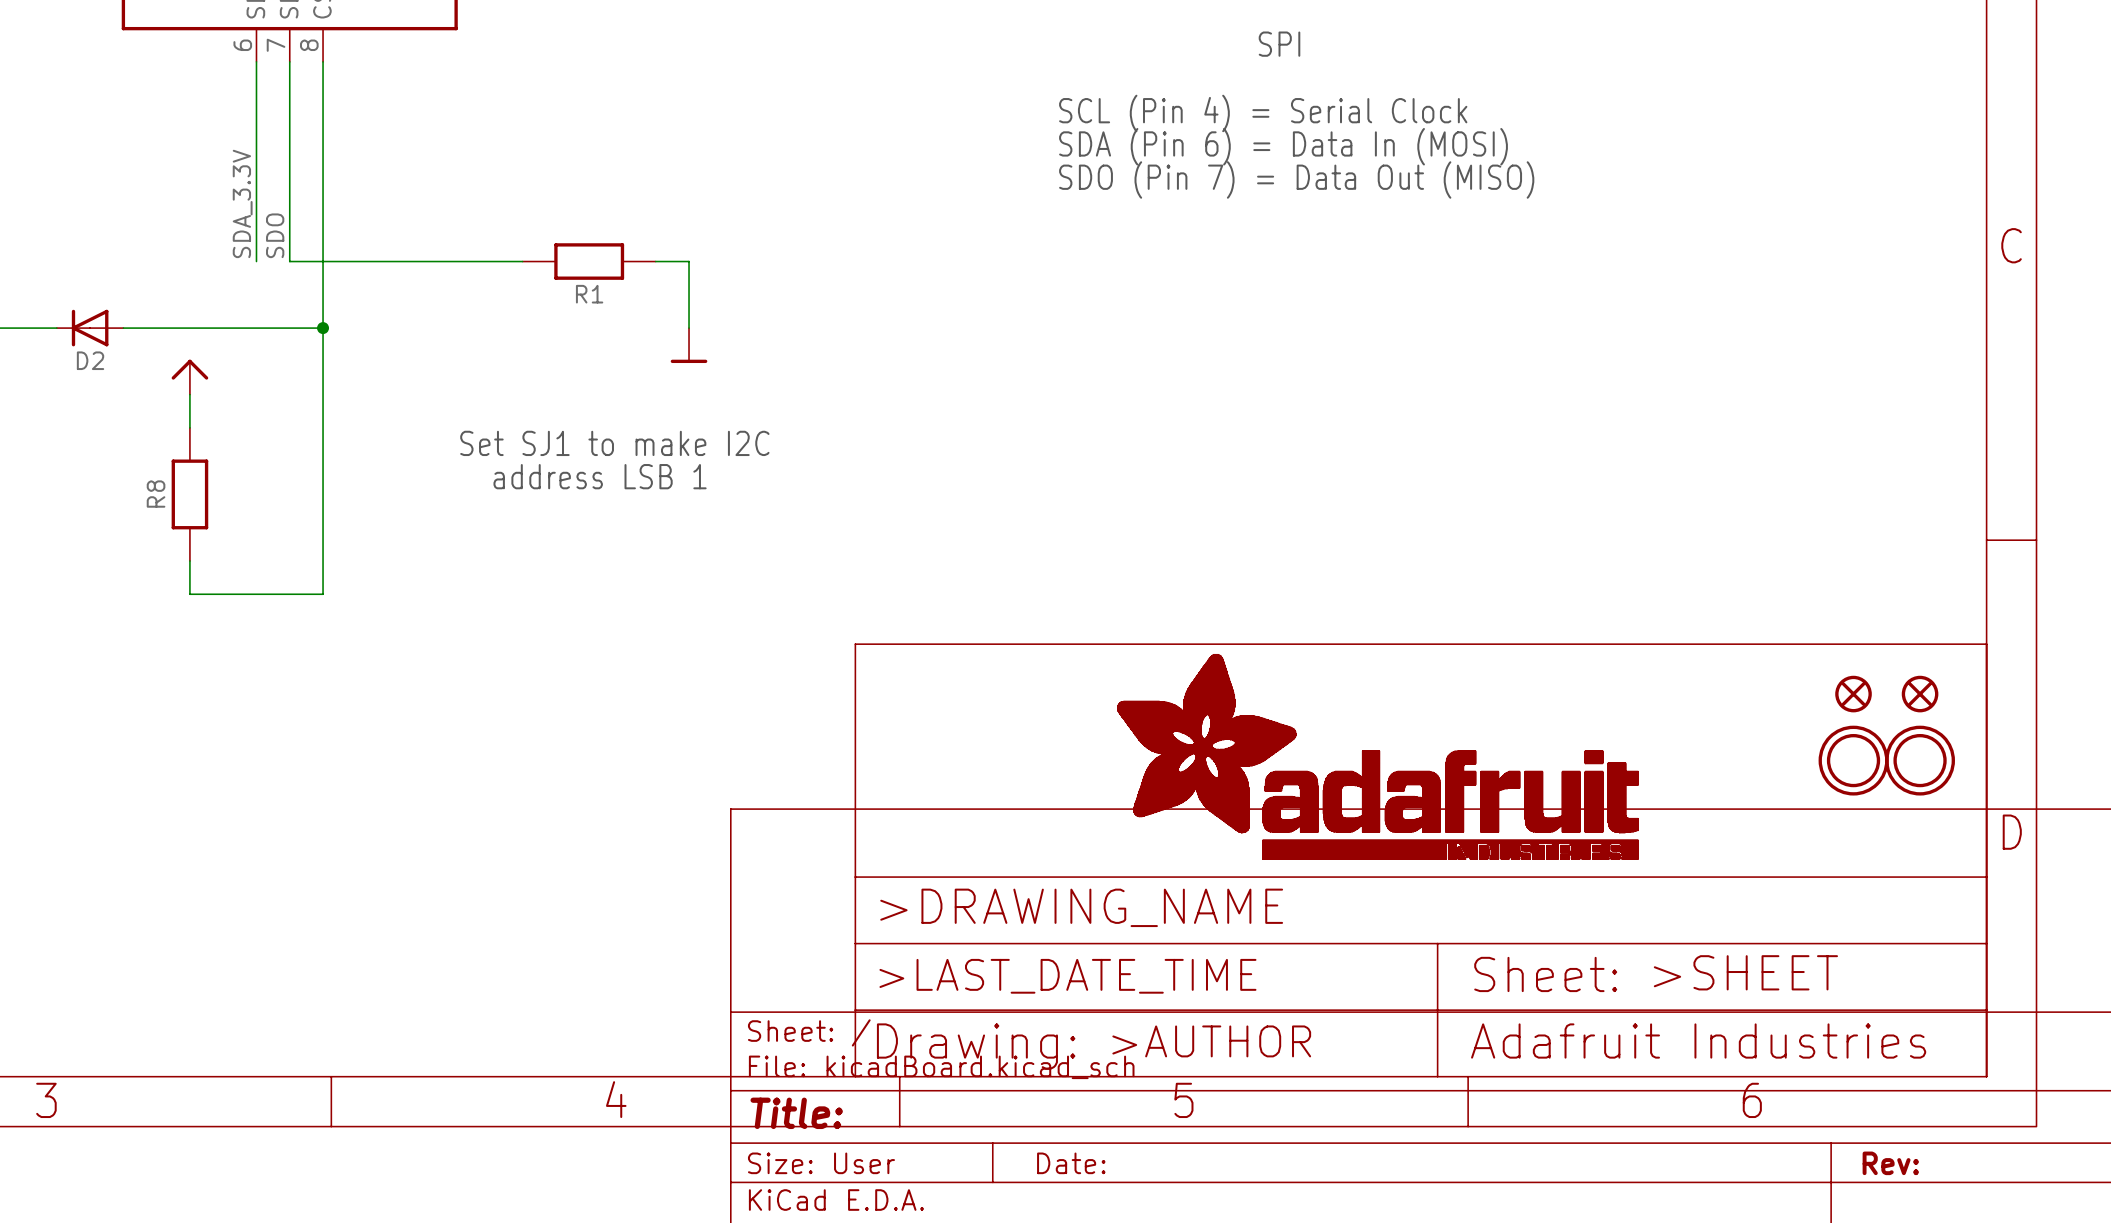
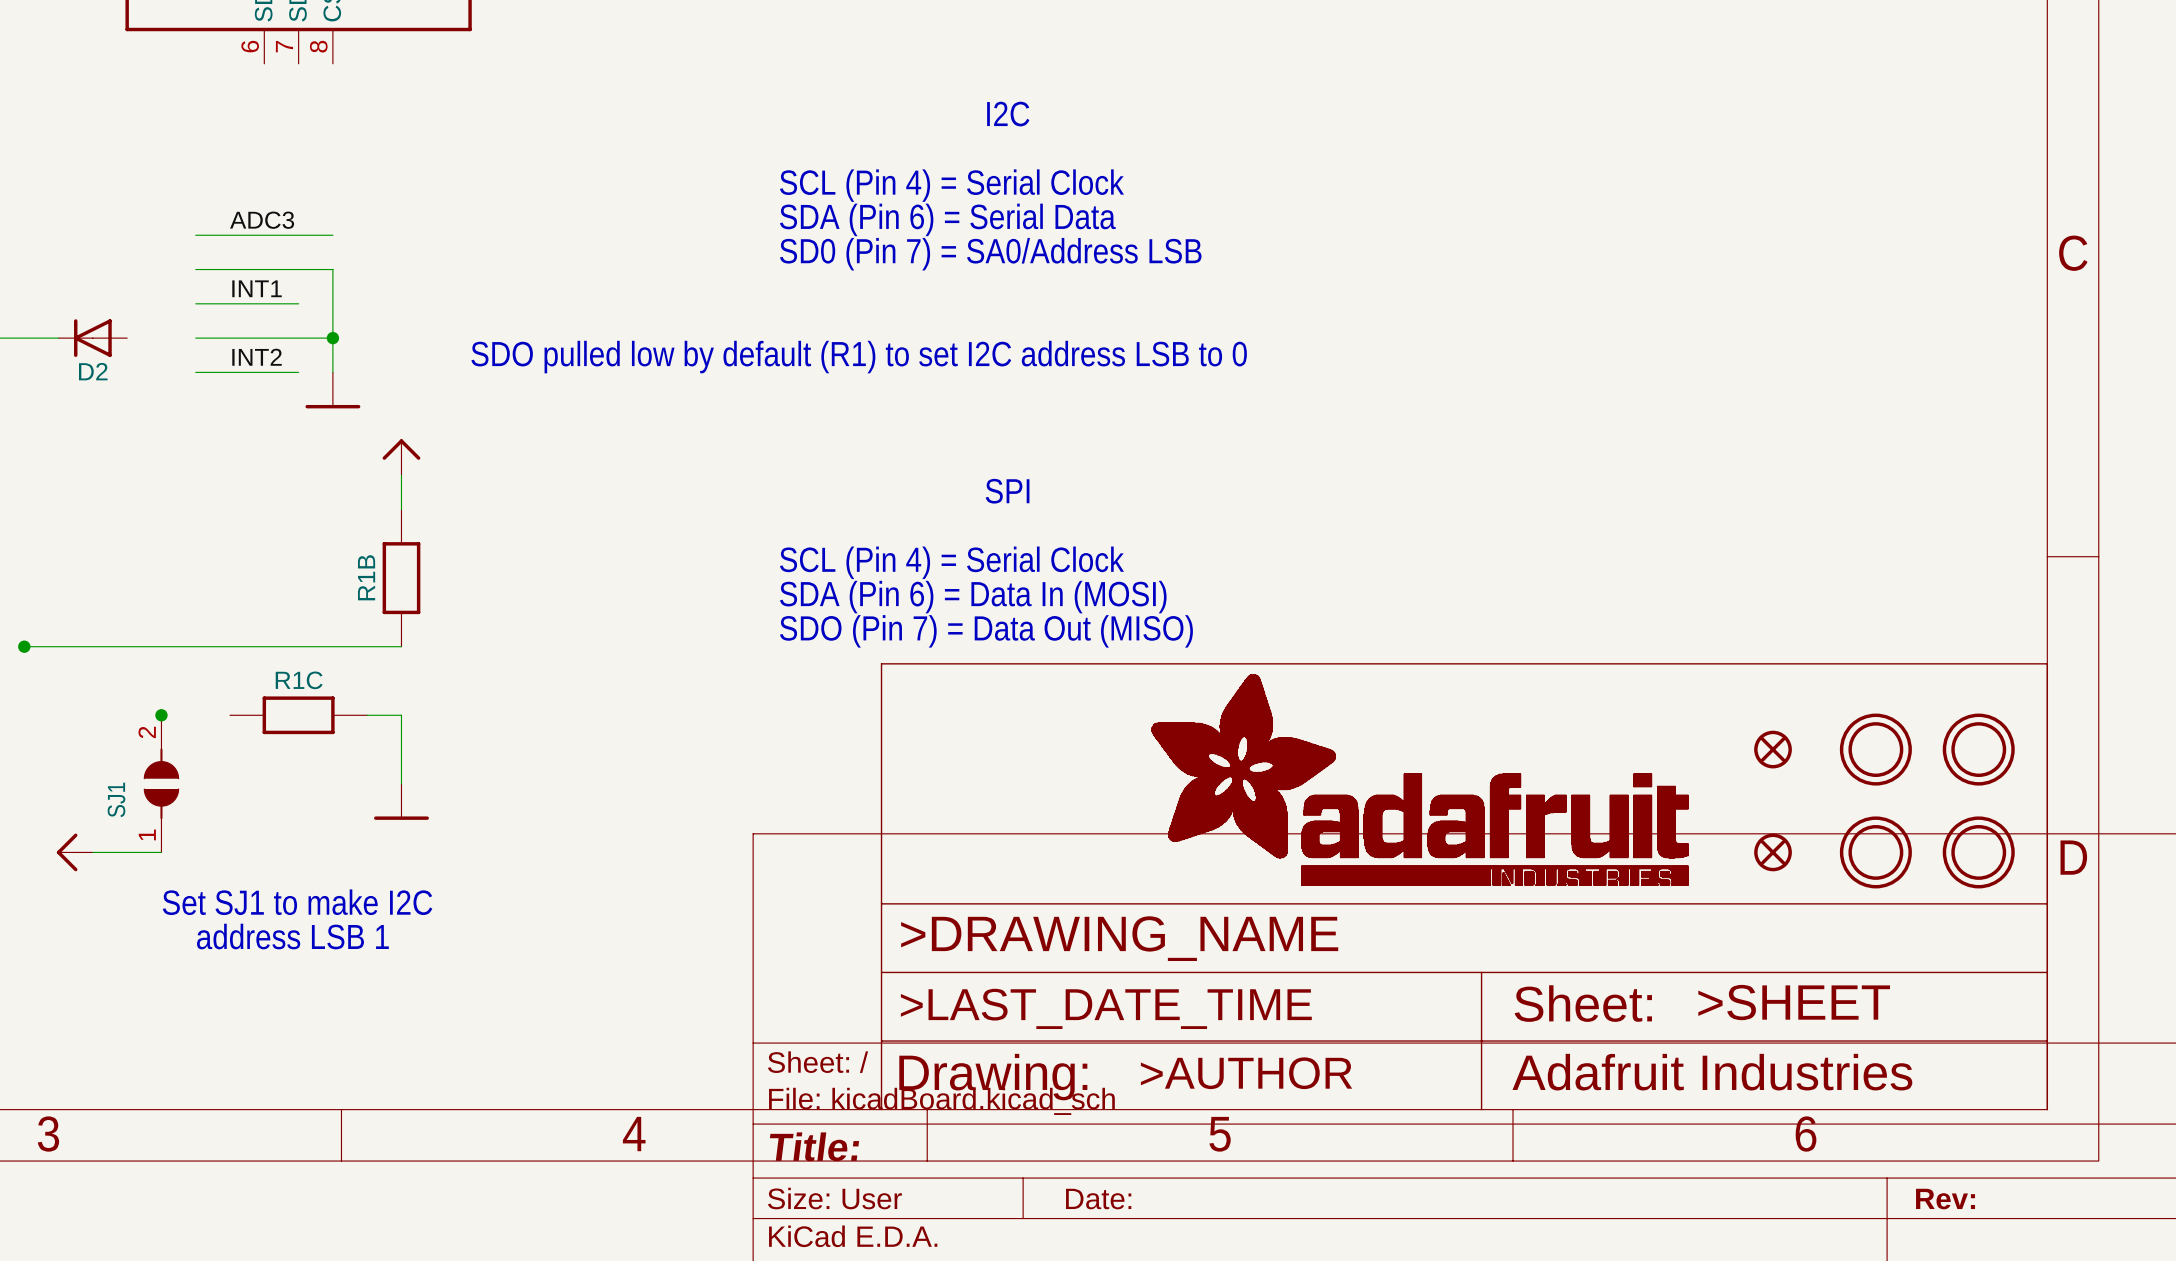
text: SPI (1279, 44) -> none
wire: (256, 61) (256, 261) -> none
wire: (289, 61) (289, 261) -> (195, 269) (298, 269)
wire: (323, 61) (323, 261) (522, 261) -> none
text: none -> I2C (1008, 114)
text: SCL (Pin 4) = Serial Clock (1263, 113) -> none
text: SDA (Pin 6) = Data In (MOSI) (1283, 146) -> none
text: none -> SCL (Pin 4) = Serial Clock (951, 185)
text: SDO (Pin 7) = Data Out (MISO) (1296, 179) -> none
label: SDA_3.3V (242, 203) -> none
label: none -> ADC3 (262, 220)
text: none -> SDA (Pin 6) = Serial Data (947, 219)
wire: none -> (195, 235) (332, 235)
label: SDO (275, 235) -> none
text: none -> SD0 (Pin 7) = SA0/Address LSB (990, 254)
R1: (589, 261) -> none
wire: (655, 261) (689, 261) (689, 328) -> none
label: none -> INT1 (257, 288)
wire: none -> (195, 303) (298, 303)
wire: (123, 328) (189, 328) -> none
power symbol: (689, 345) -> none
label: none -> INT2 (257, 357)
text: none -> SDO pulled low by default (R1) to set I2C address LSB to 0 (859, 357)
wire: none -> (195, 372) (298, 372)
wire: (323, 361) (323, 594) (189, 594) (189, 560) -> none
power symbol position: (189, 377) -> (401, 457)
power symbol: none -> (332, 390)
wire: (189, 394) (189, 427) -> (401, 475) (401, 509)
text: Set SJ1 to make I2C (614, 443) -> none
text: address LSB 1 (600, 476) -> none
text: none -> SPI (1007, 491)
R8: (189, 494) -> none
text: none -> SCL (Pin 4) = Serial Clock (951, 562)
R1B: none -> (401, 578)
text: none -> SDA (Pin 6) = Data In (MOSI) (973, 597)
text: none -> SDO (Pin 7) = Data Out (MISO) (986, 631)
wire: none -> (24, 646) (401, 646)
junction: none -> (24, 646)
junction: none -> (161, 715)
R1C: none -> (298, 715)
wire: none -> (367, 715) (401, 715) (401, 783)
part: (1853, 694) -> none
part: (1920, 694) -> none
part: none -> (1773, 749)
part: none -> (1875, 749)
part: none -> (1978, 749)
SJ1: none -> (161, 783)
part: (1853, 760) -> none
part: (1920, 760) -> none
power symbol: none -> (401, 801)
power symbol: none -> (74, 852)
wire: none -> (92, 852) (161, 852)
part: none -> (1773, 852)
part: none -> (1875, 852)
part: none -> (1978, 852)
text: none -> Set SJ1 to make I2C (297, 902)
text: none -> address LSB 1 (292, 936)

